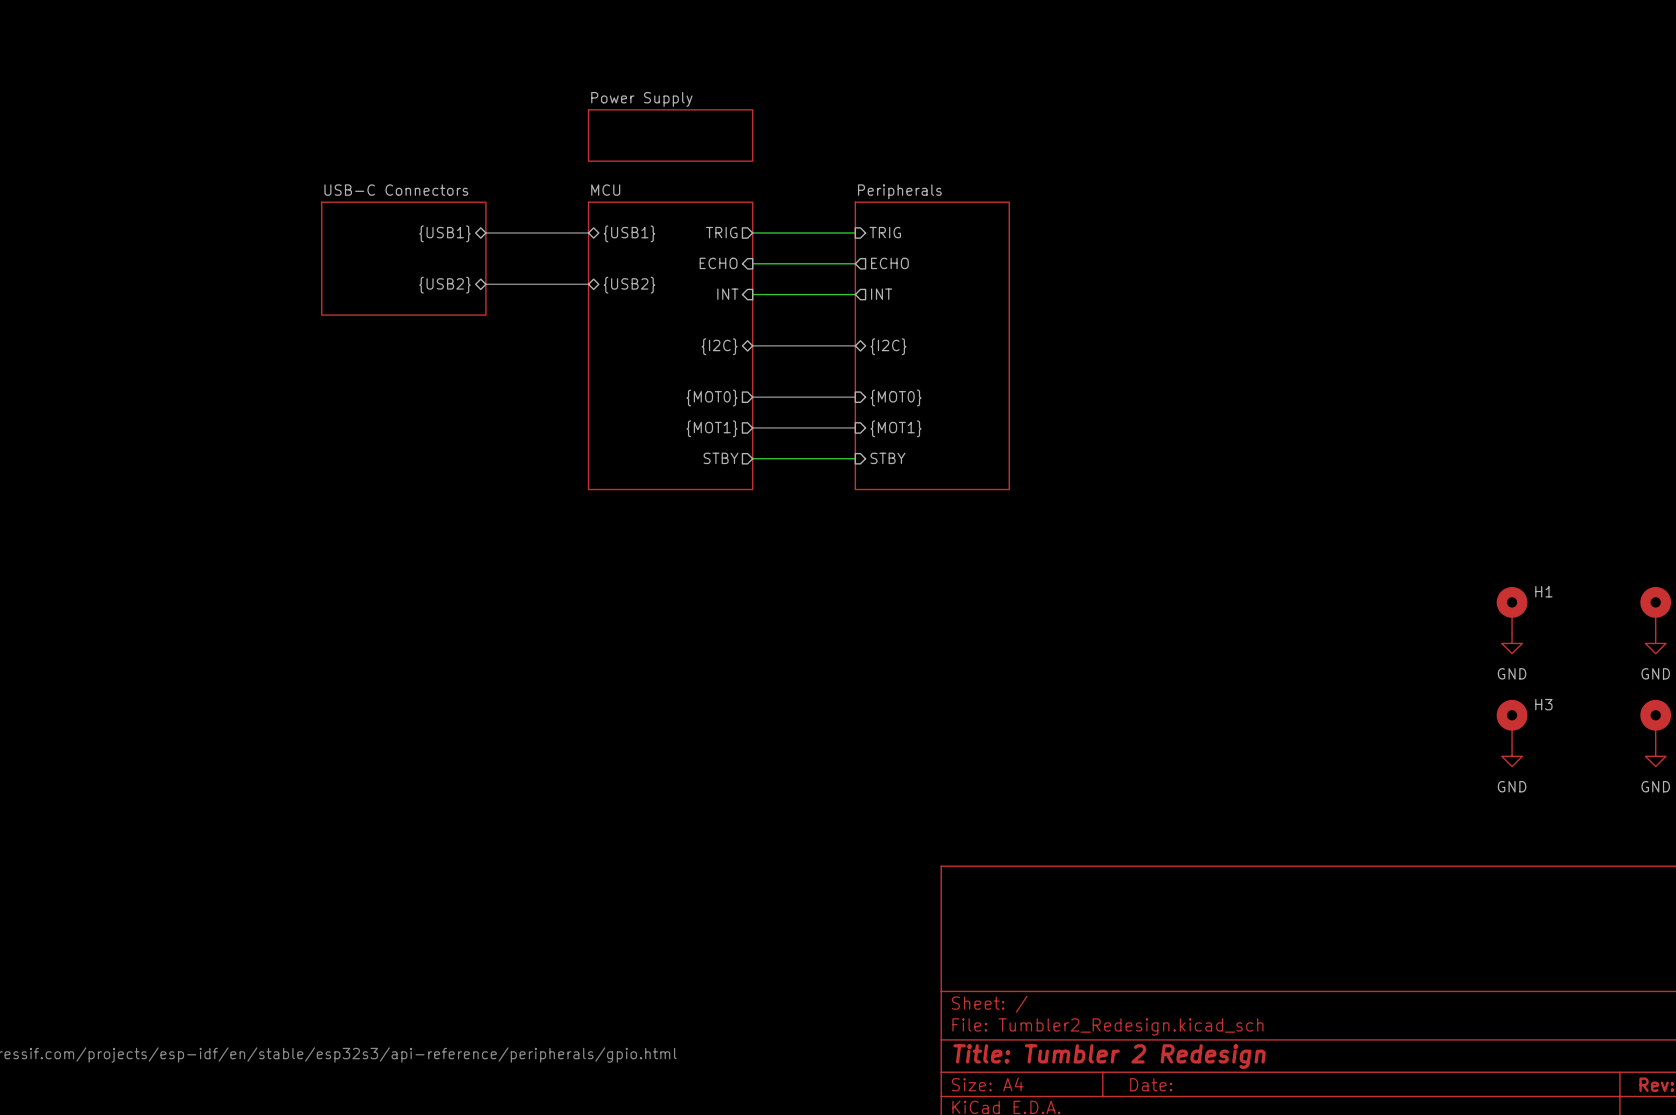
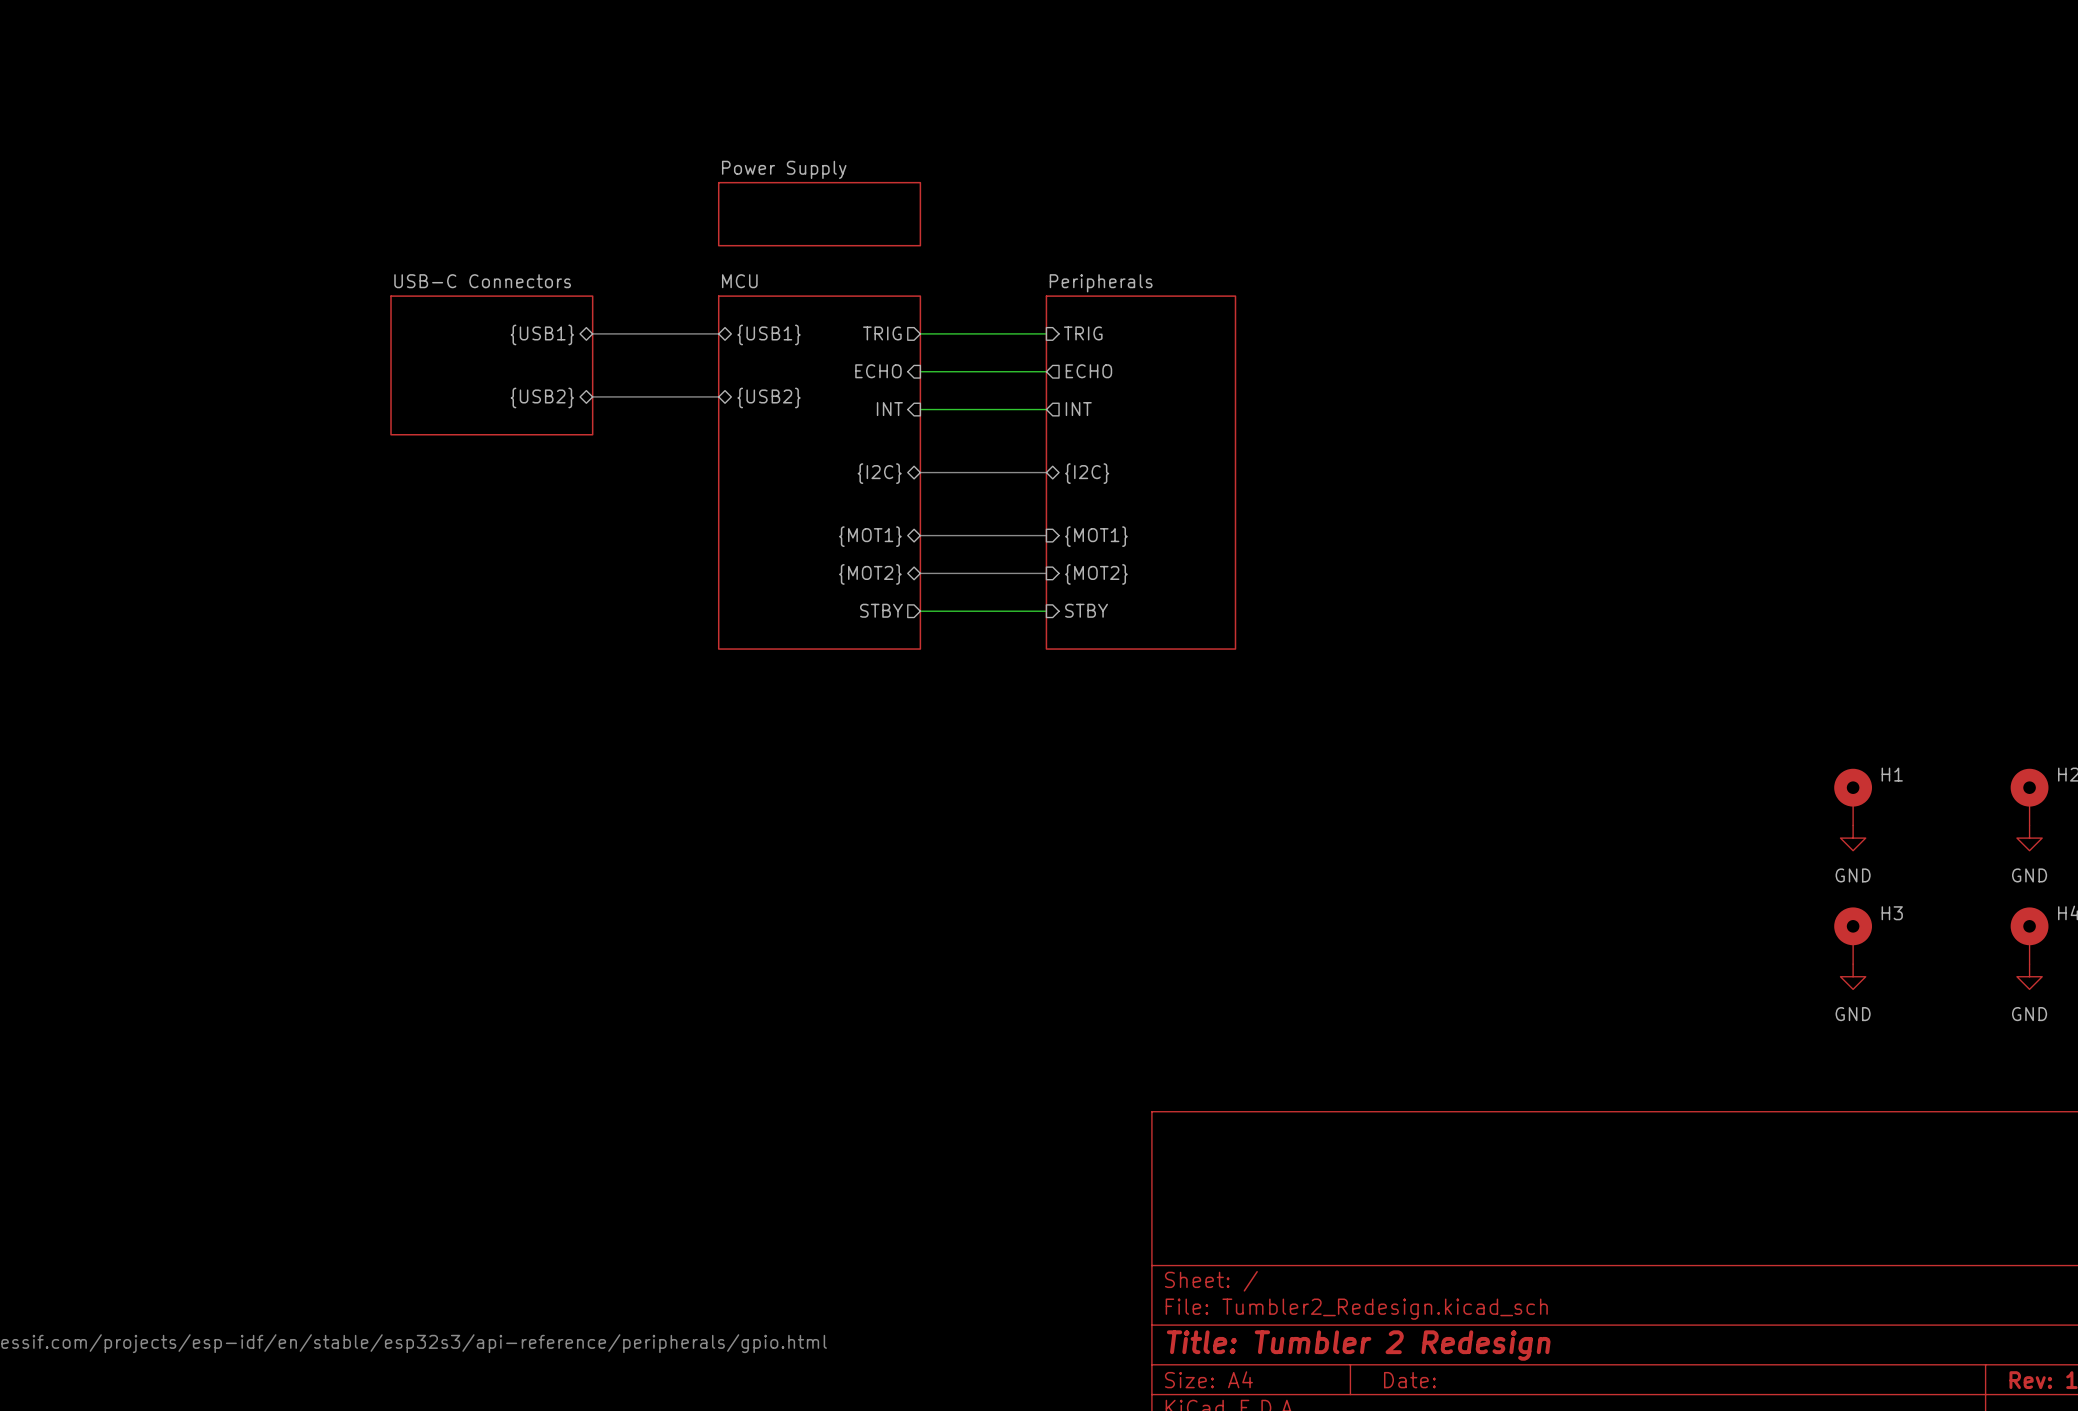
sheet pin shape: output (712, 398) -> bidirectional (870, 536)
sheet pin: {MOT0} (712, 398) -> {MOT1} (870, 536)
sheet pin: {MOT0} (896, 398) -> {MOT1} (1096, 536)
sheet pin shape: output (712, 428) -> bidirectional (870, 574)
sheet pin: {MOT1} (712, 428) -> {MOT2} (870, 574)
sheet pin: {MOT1} (896, 428) -> {MOT2} (1096, 574)

